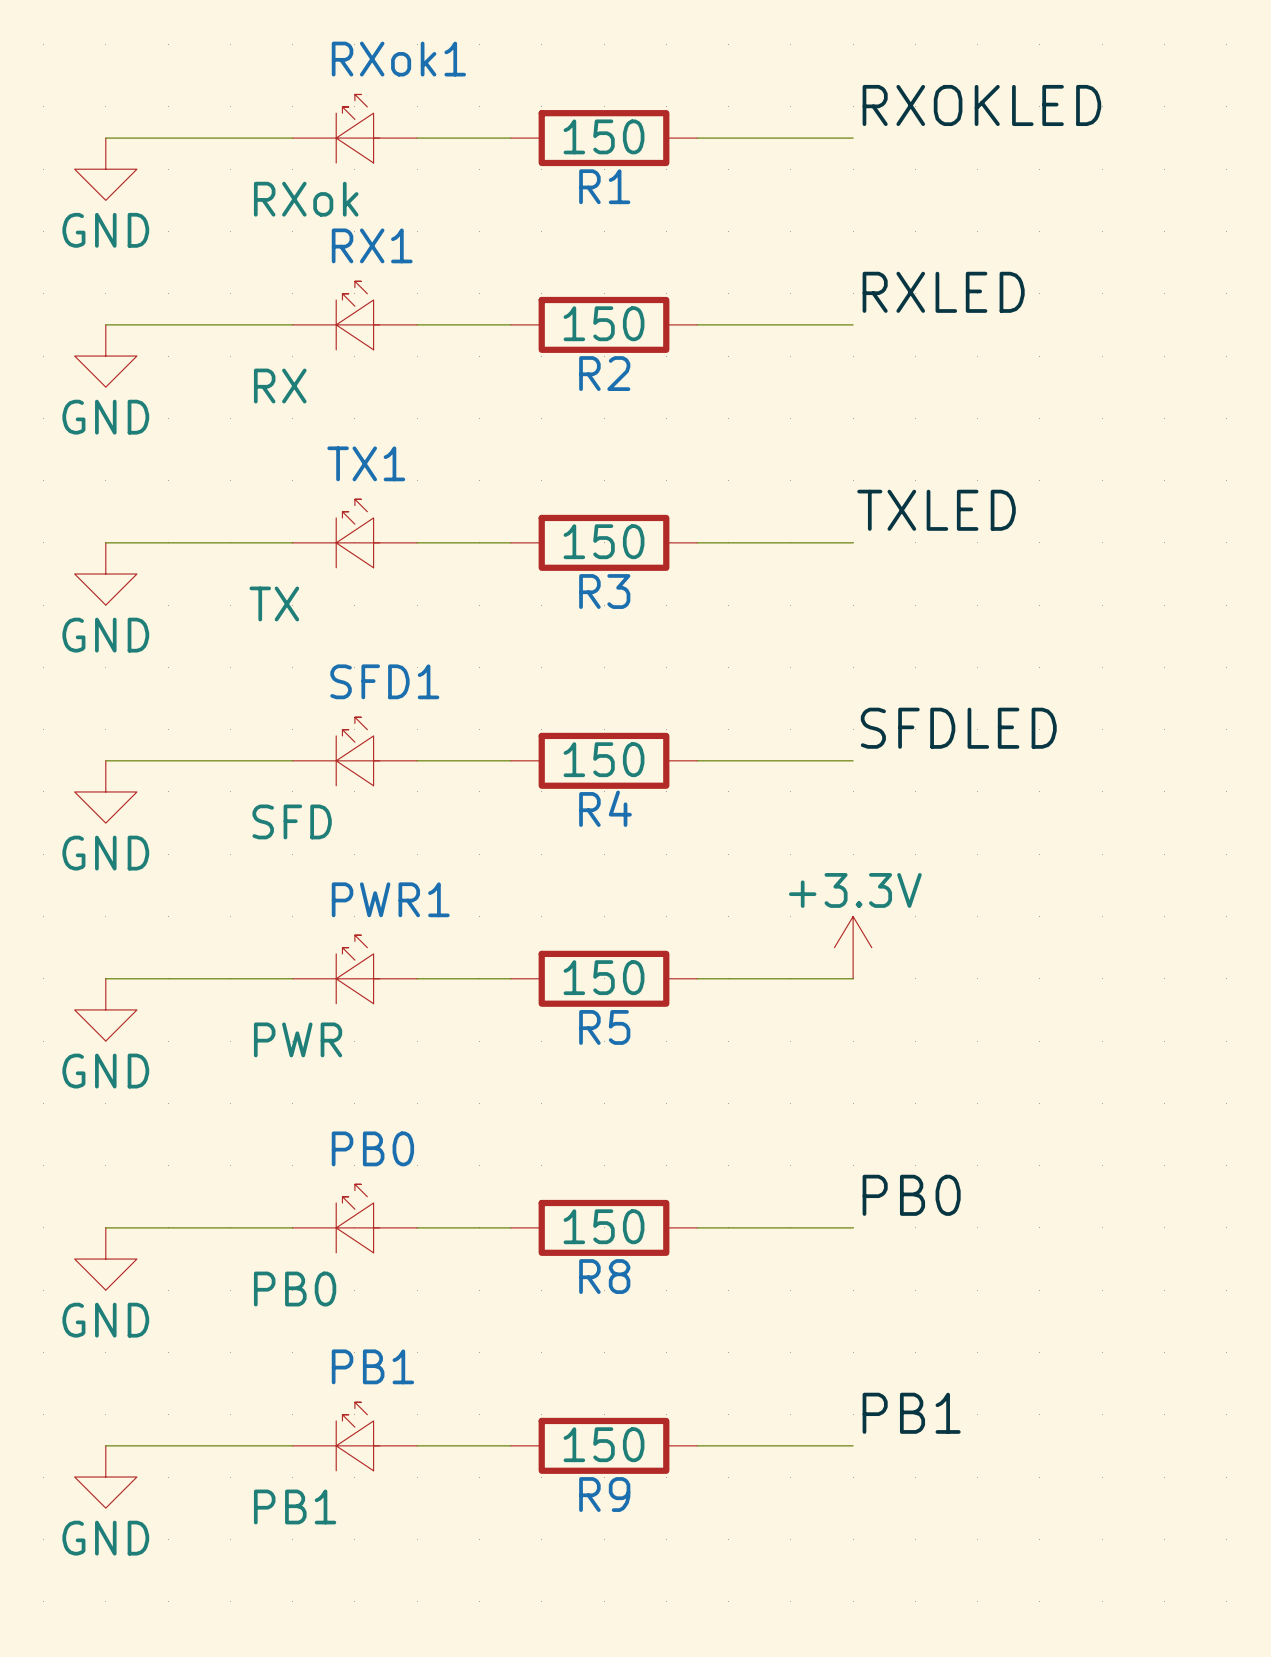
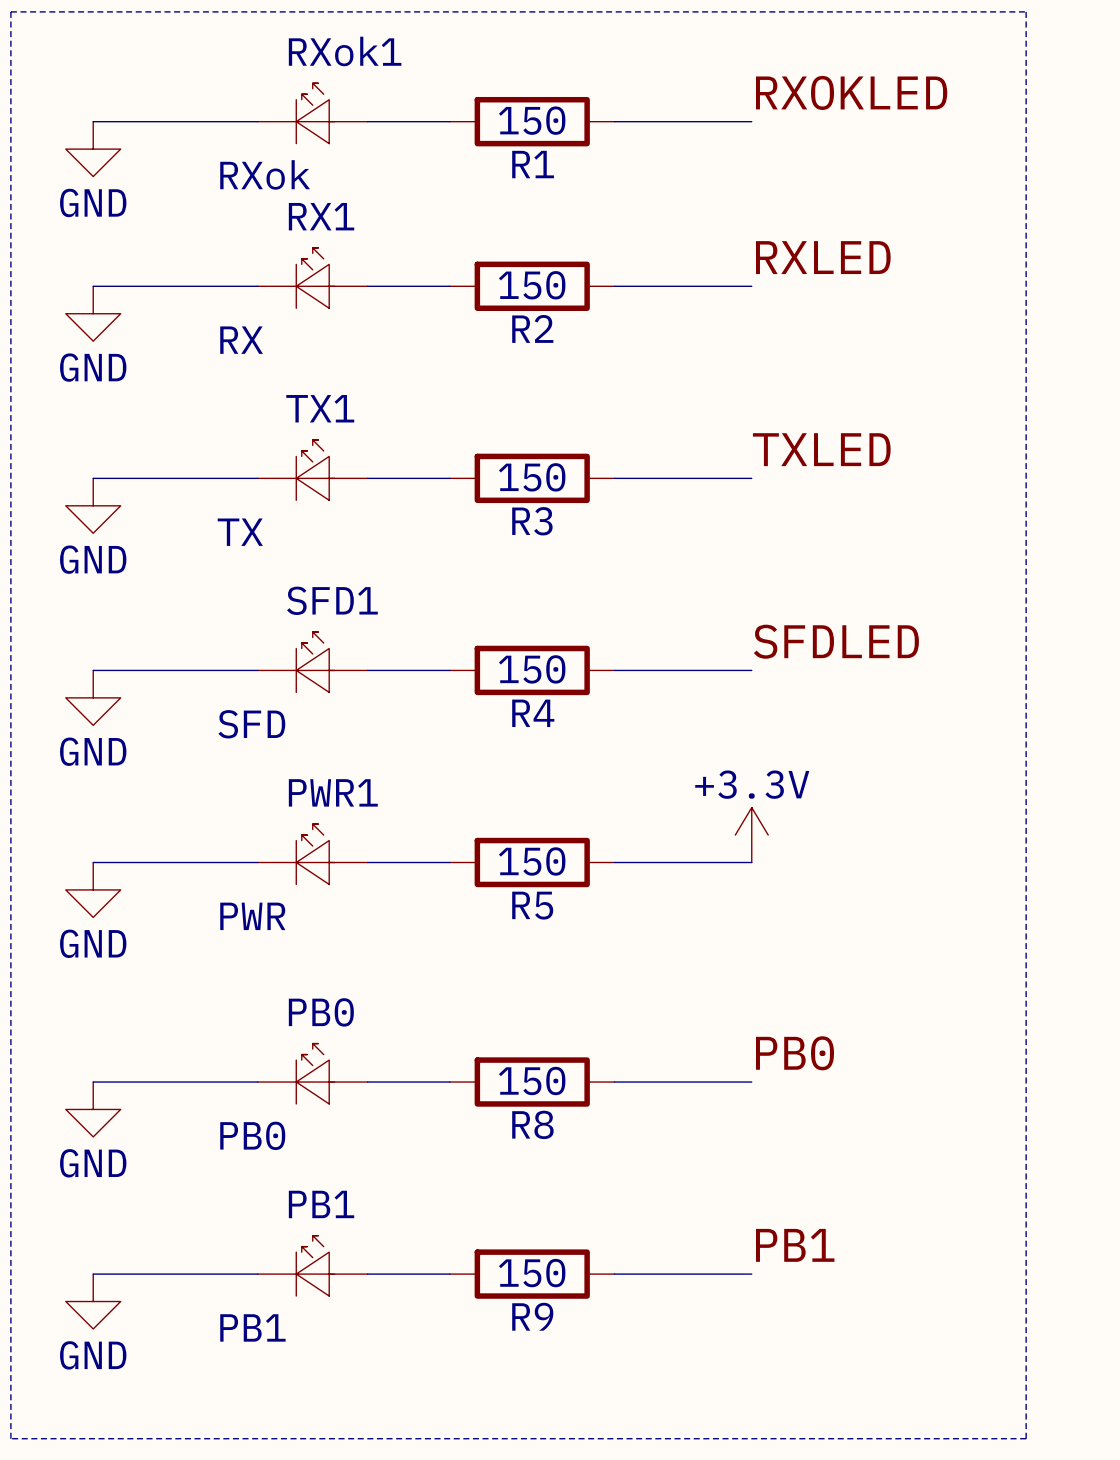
line: none -> (10, 11) (1026, 11) (1026, 1438) (10, 1438) (10, 11)

